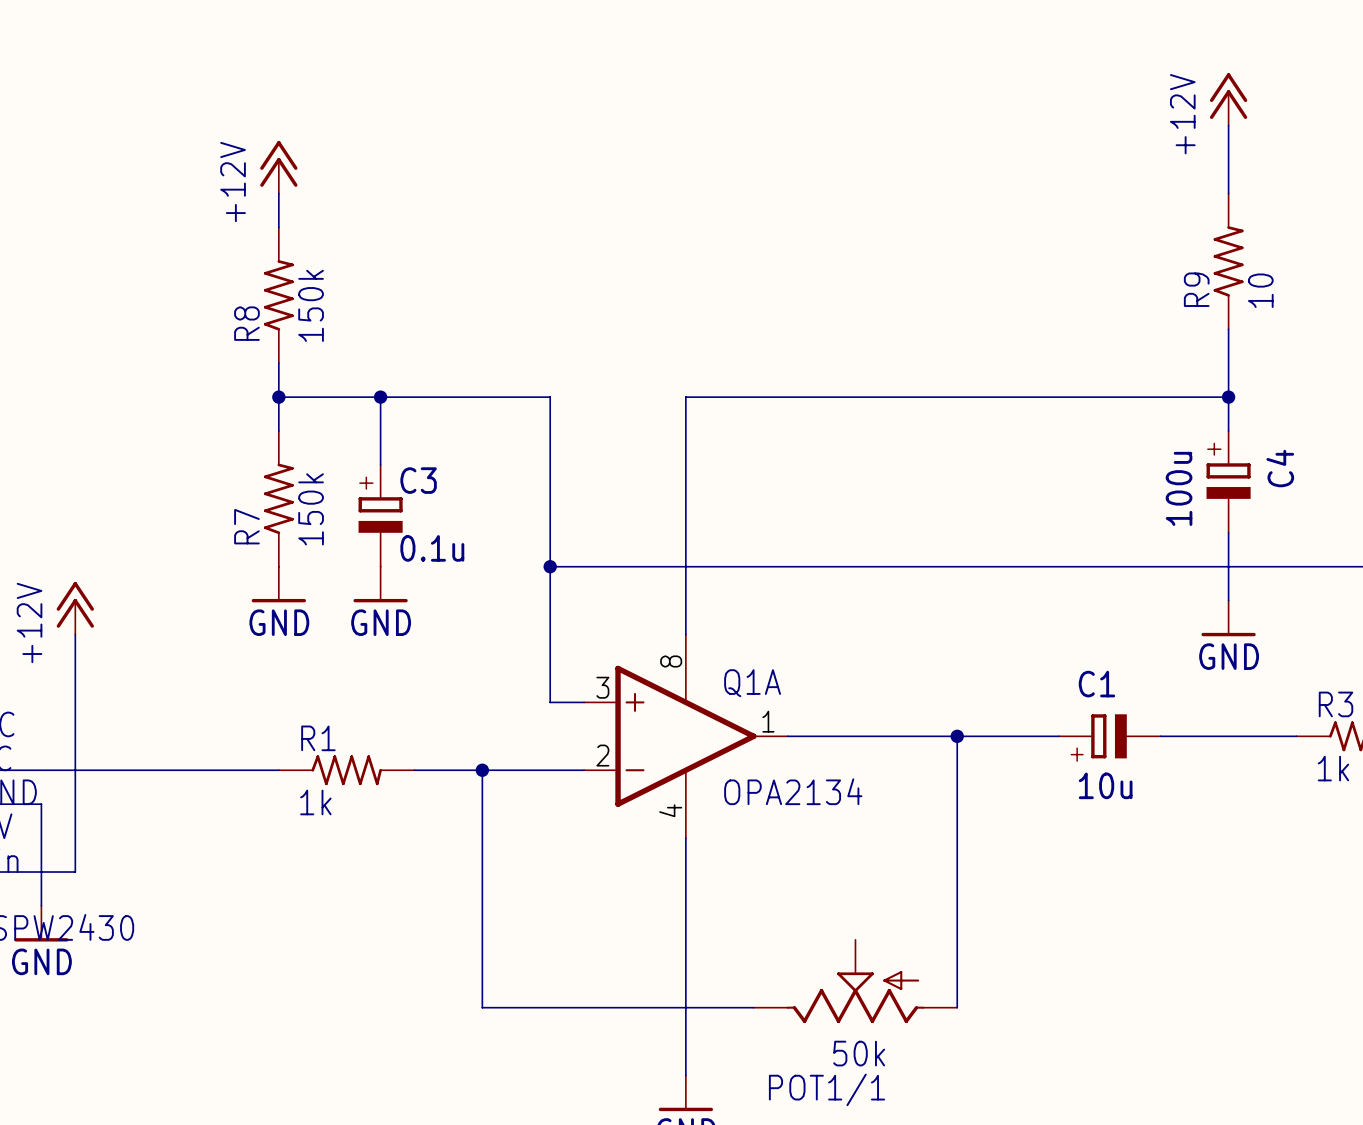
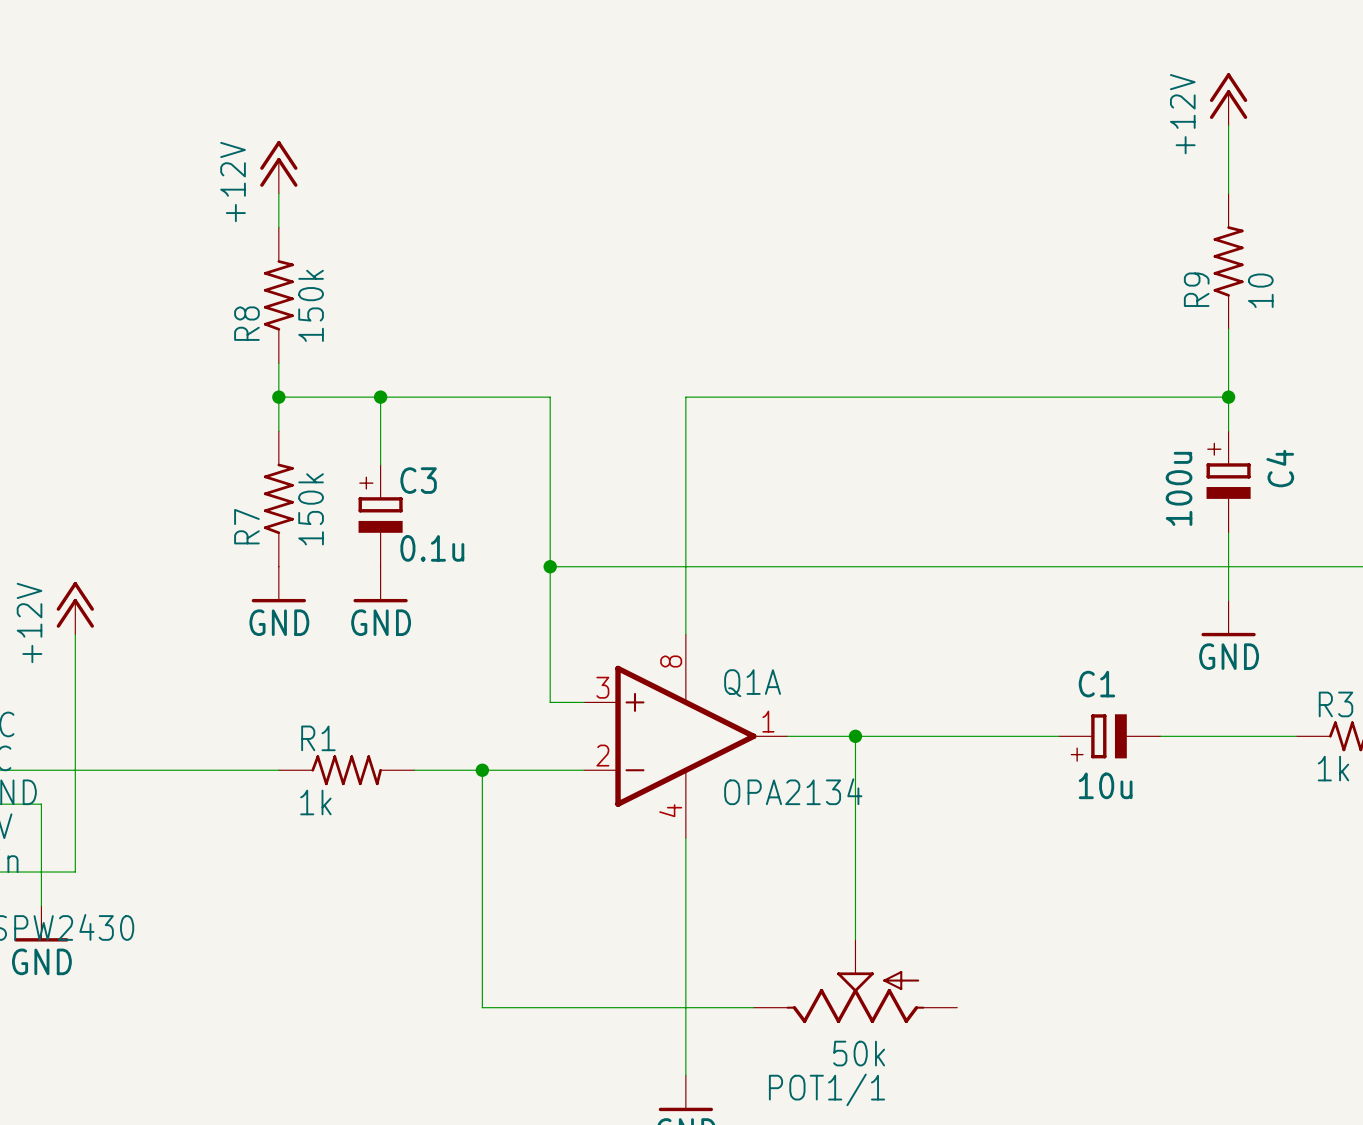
wire: none -> (855, 736) (855, 939)
junction: none -> (855, 736)
wire: (957, 736) (957, 1007) -> none
junction: (957, 736) -> none

